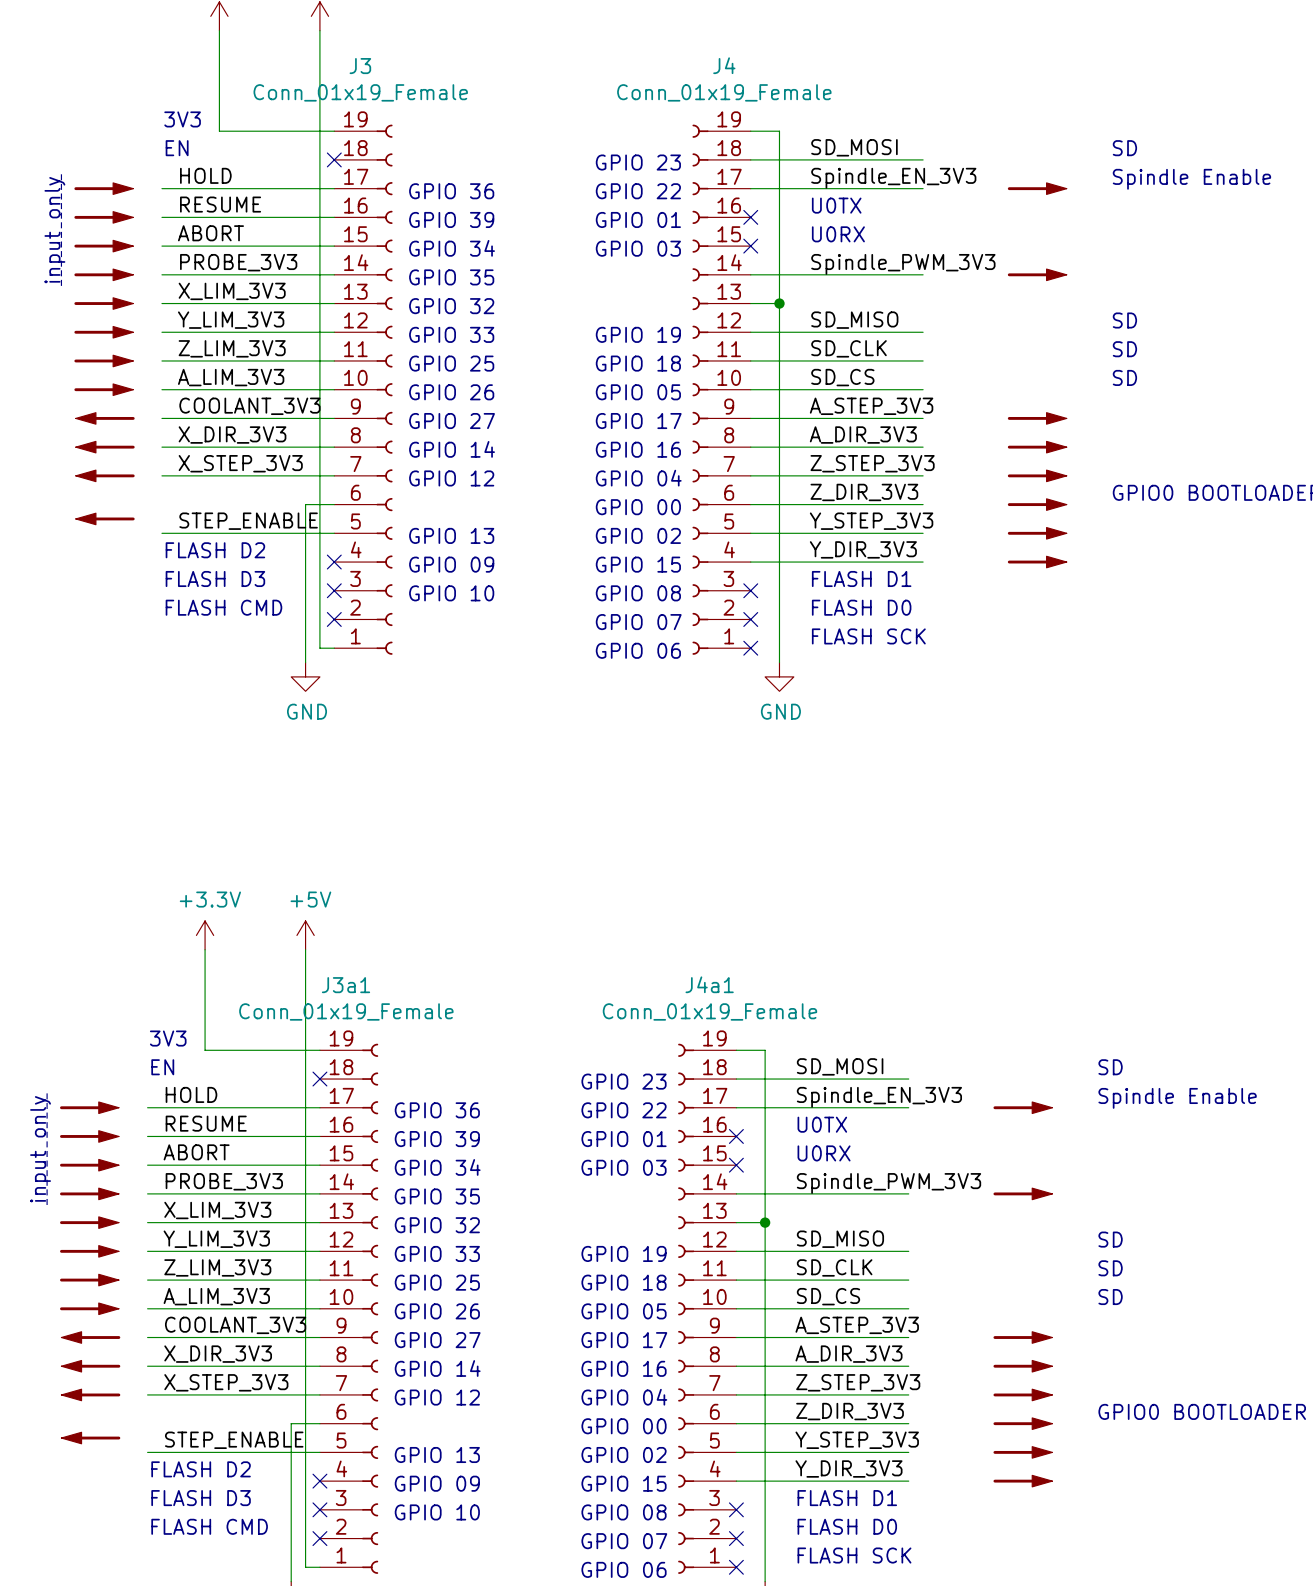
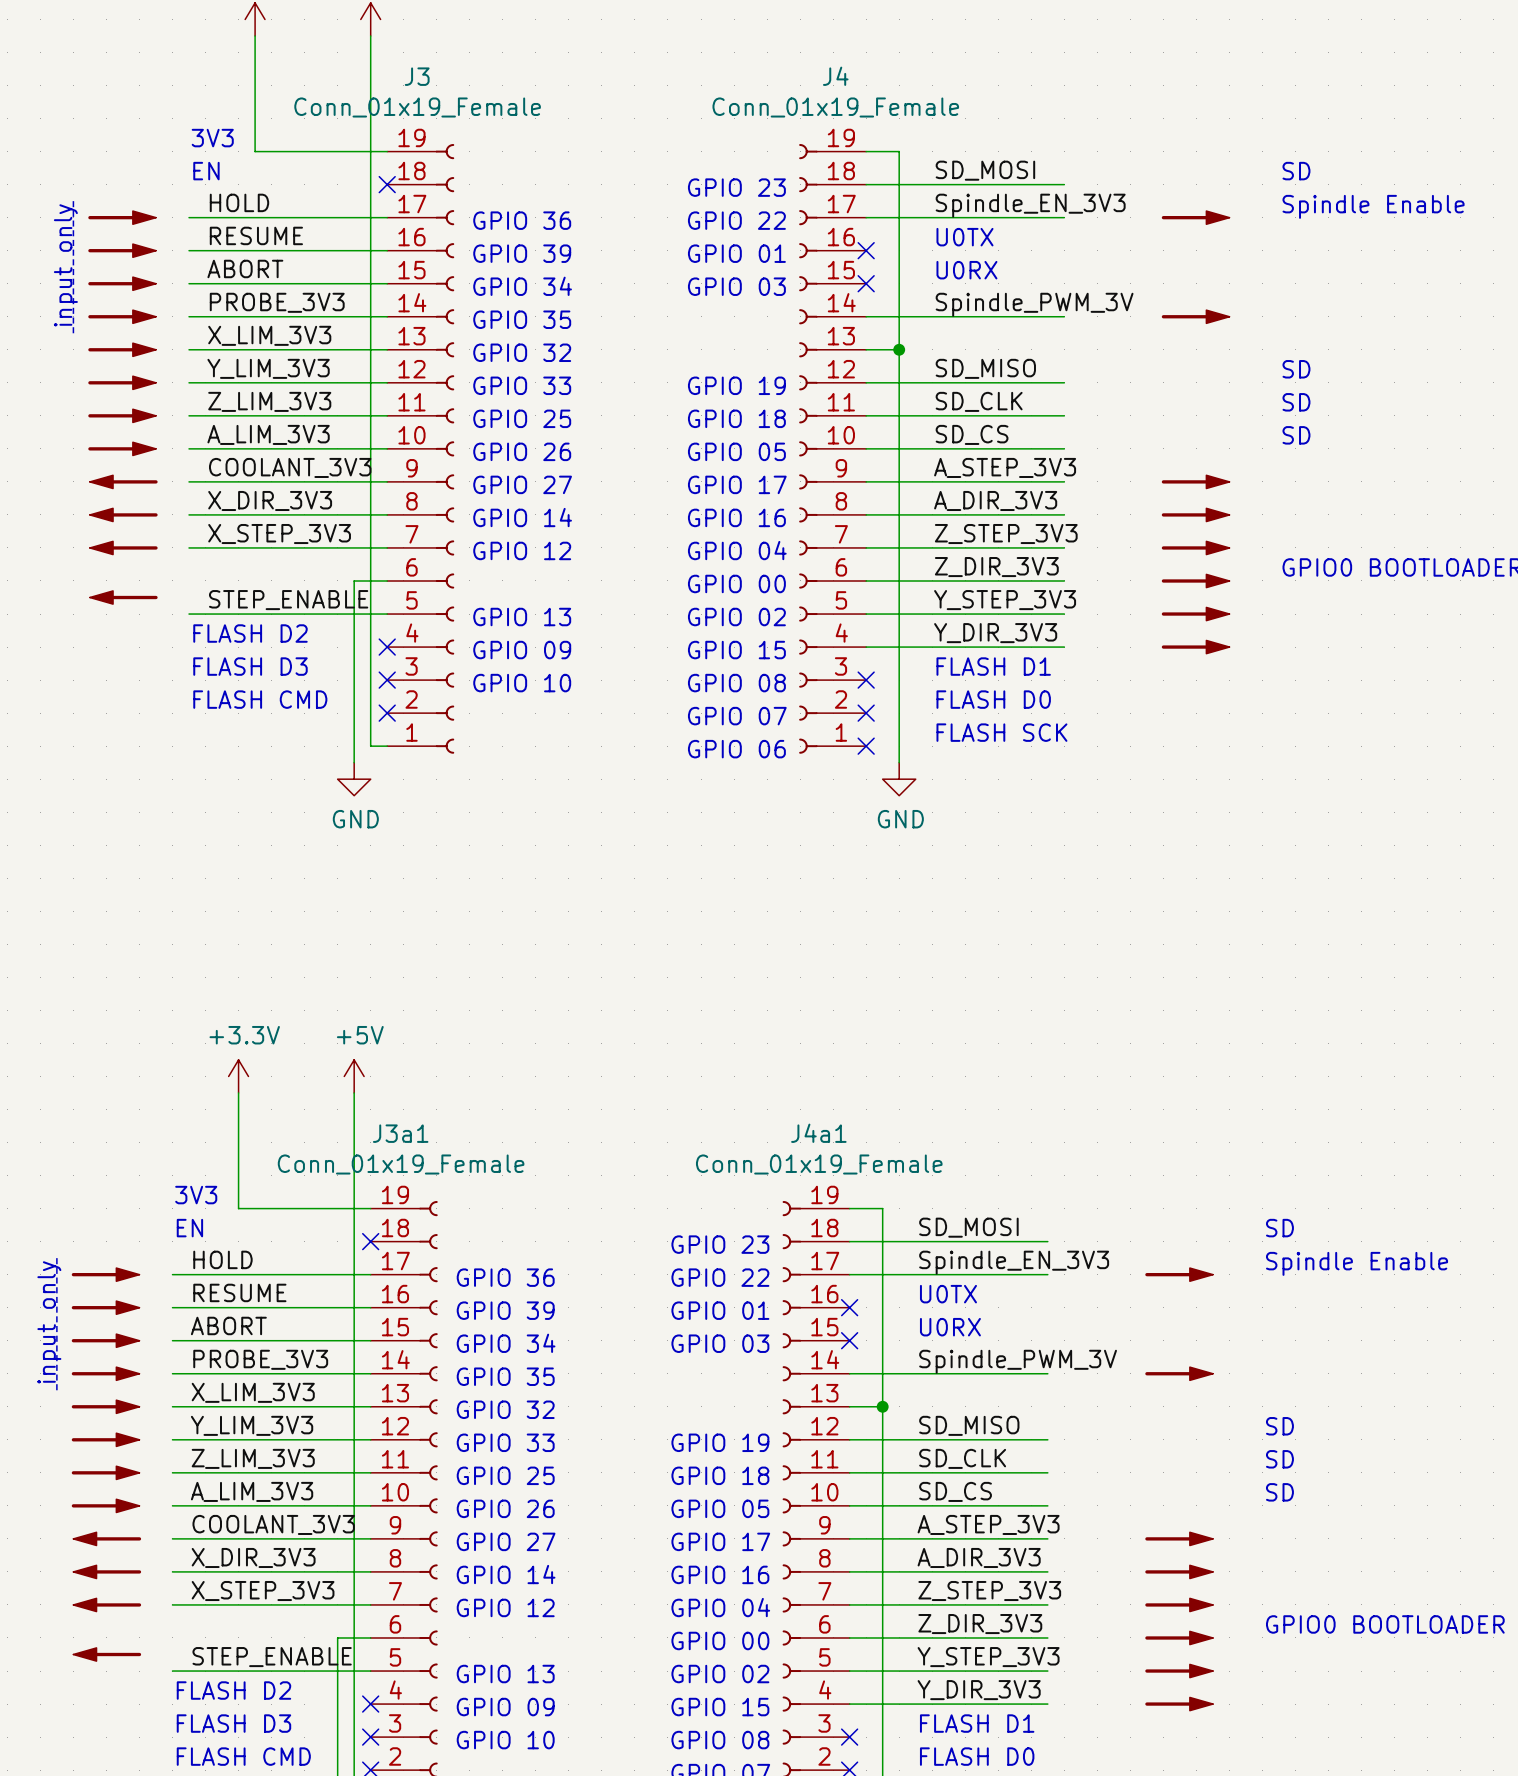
label: Spindle_PWM_3V3 (903, 264) -> Spindle_PWM_3V (1034, 304)
label: Spindle_PWM_3V3 (889, 1183) -> Spindle_PWM_3V (1018, 1361)

